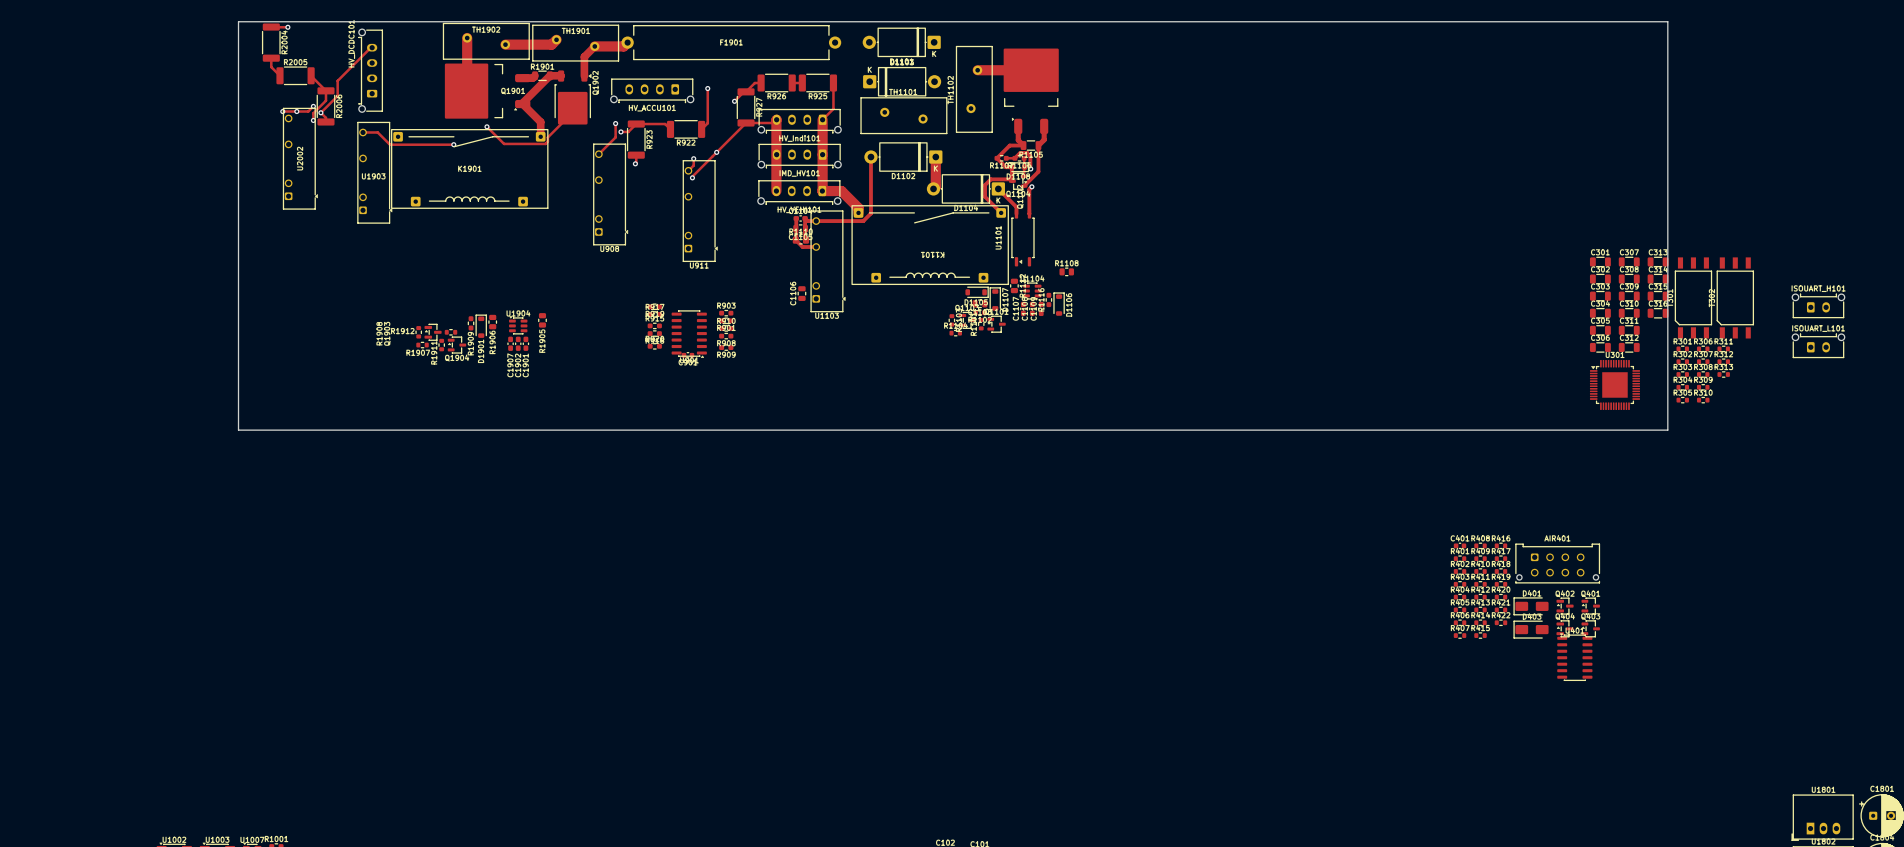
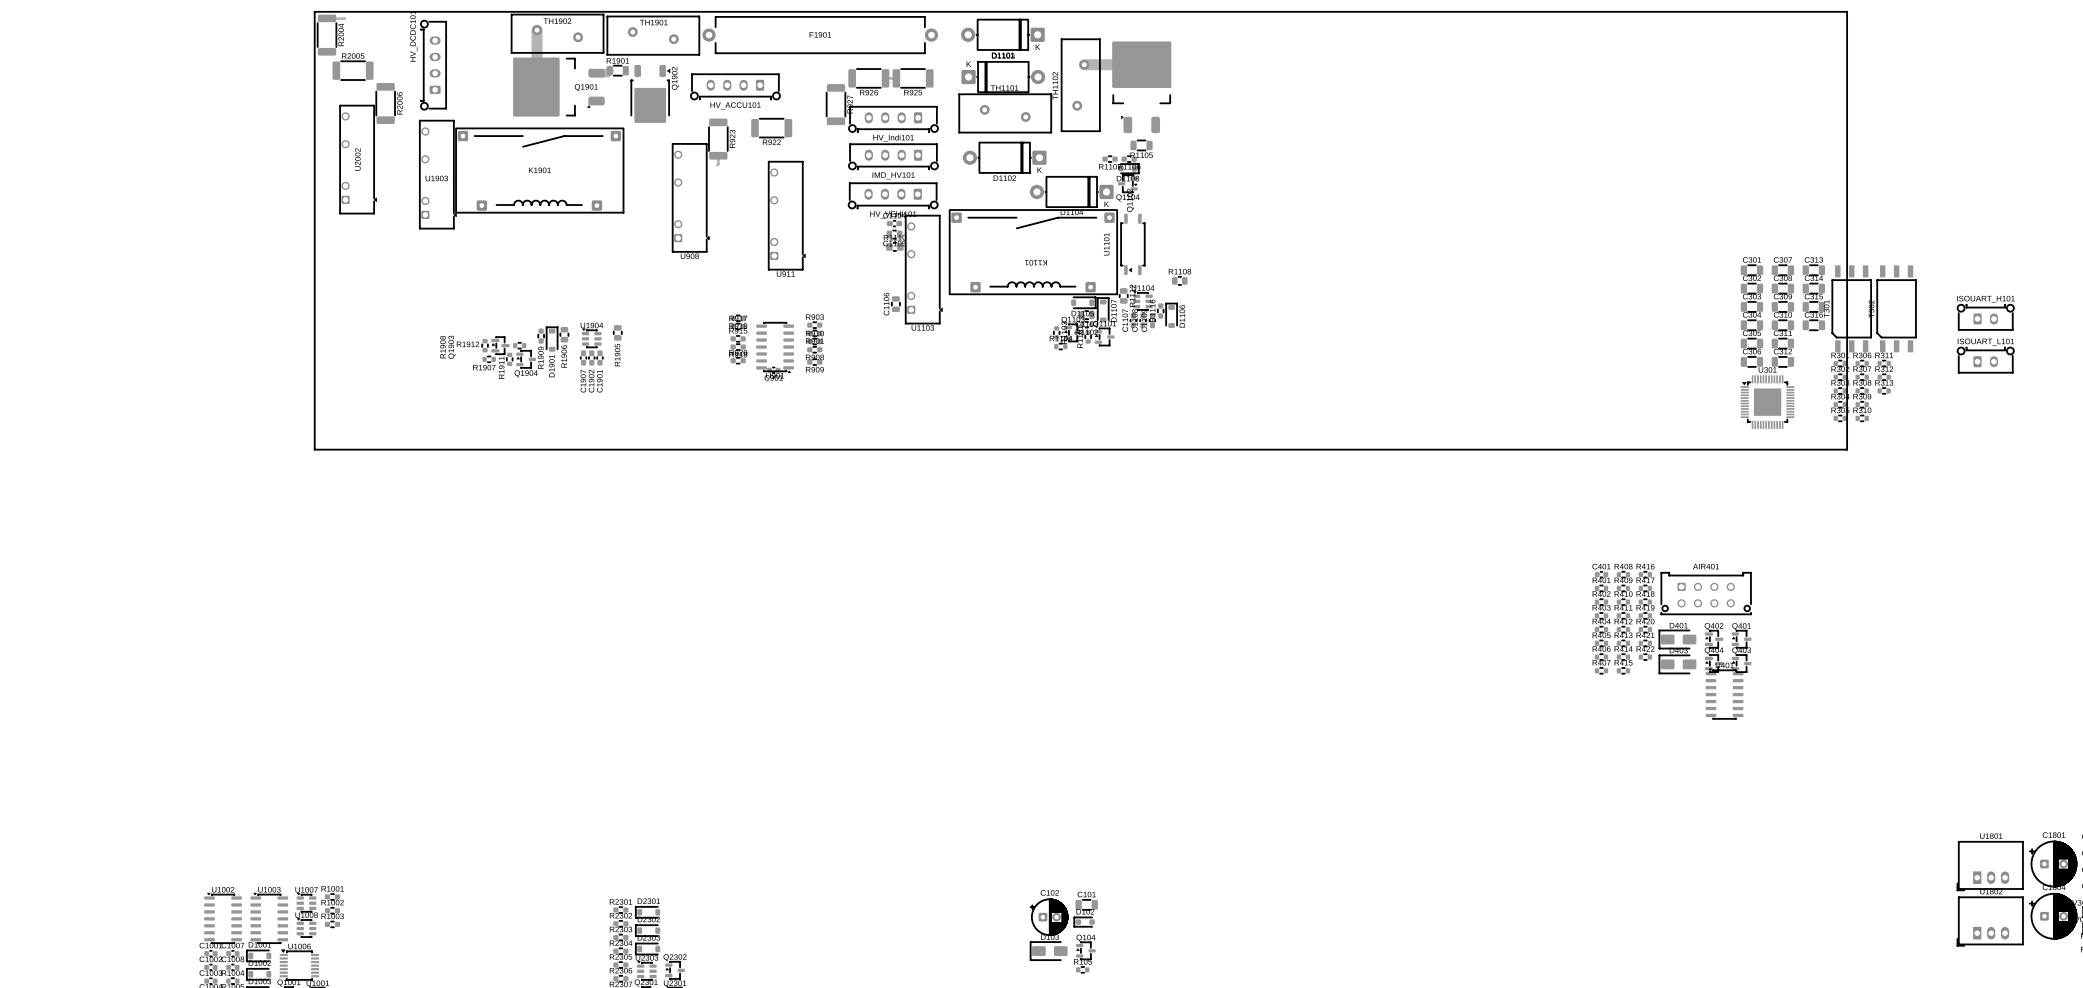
board edge: (238, 21) (1667, 21) (1667, 430) (238, 430) (238, 21) -> (314, 11) (1847, 11) (1847, 449) (314, 449) (314, 11)
via: (287, 27) -> none
track: (556, 39) (551, 44) (505, 44) -> none
track: (627, 42) (623, 46) (594, 46) (584, 56) (584, 76) -> none
track: (374, 47) (370, 47) (337, 80) (337, 96) (320, 112) (325, 117) (325, 121) -> none
track: (271, 58) (271, 67) (279, 75) -> none
track: (311, 75) (325, 90) (325, 100) (313, 113) (313, 120) -> none
track: (561, 76) (549, 75) (522, 103) (540, 122) (540, 136) -> none
track: (761, 83) (754, 83) (734, 101) -> none
track: (833, 83) (833, 108) (822, 119) (822, 191) (841, 191) (858, 208) (858, 212) -> none
track: (707, 88) (707, 123) (701, 129) -> none
via: (707, 88) -> none
via: (734, 101) -> none
track: (313, 106) (308, 111) (282, 111) -> none
via: (313, 106) -> none
track: (572, 108) (572, 112) (547, 137) (545, 143) (504, 143) (486, 126) -> none
via: (282, 111) -> none
via: (296, 111) -> none
via: (320, 112) -> none
via: (313, 120) -> none
track: (615, 123) (615, 137) (598, 154) -> none
via: (615, 123) -> none
via: (486, 126) -> none
track: (1018, 126) (1018, 140) (1023, 145) (1009, 145) (997, 158) (1005, 167) (1011, 167) (1011, 180) -> none
track: (1044, 126) (1044, 139) (1038, 145) (1038, 171) (1024, 186) -> none
track: (670, 129) (665, 124) (636, 124) (628, 131) (620, 131) -> none
via: (620, 131) -> none
track: (363, 132) (377, 132) (389, 144) (453, 144) -> none
via: (453, 144) -> none
via: (716, 152) -> none
track: (870, 157) (870, 213) (863, 221) (807, 221) (805, 218) (806, 240) -> none
track: (935, 157) (935, 186) (933, 188) -> none
track: (693, 158) (693, 165) (688, 170) -> none
via: (693, 158) -> none
track: (1006, 158) (1014, 158) (1020, 152) (1027, 152) (1030, 156) (1030, 168) -> none
via: (635, 163) -> none
via: (1030, 168) -> none
track: (692, 177) (746, 123) (773, 123) (776, 119) (776, 191) -> none
via: (692, 177) -> none
track: (1012, 181) (1010, 179) (990, 179) (985, 185) (985, 196) (1001, 212) -> none
via: (1031, 186) -> none
track: (998, 188) (1016, 207) (1016, 213) -> none
track: (1030, 188) (1029, 213) -> none
track: (796, 218) (795, 240) (802, 246) (816, 246) -> none

